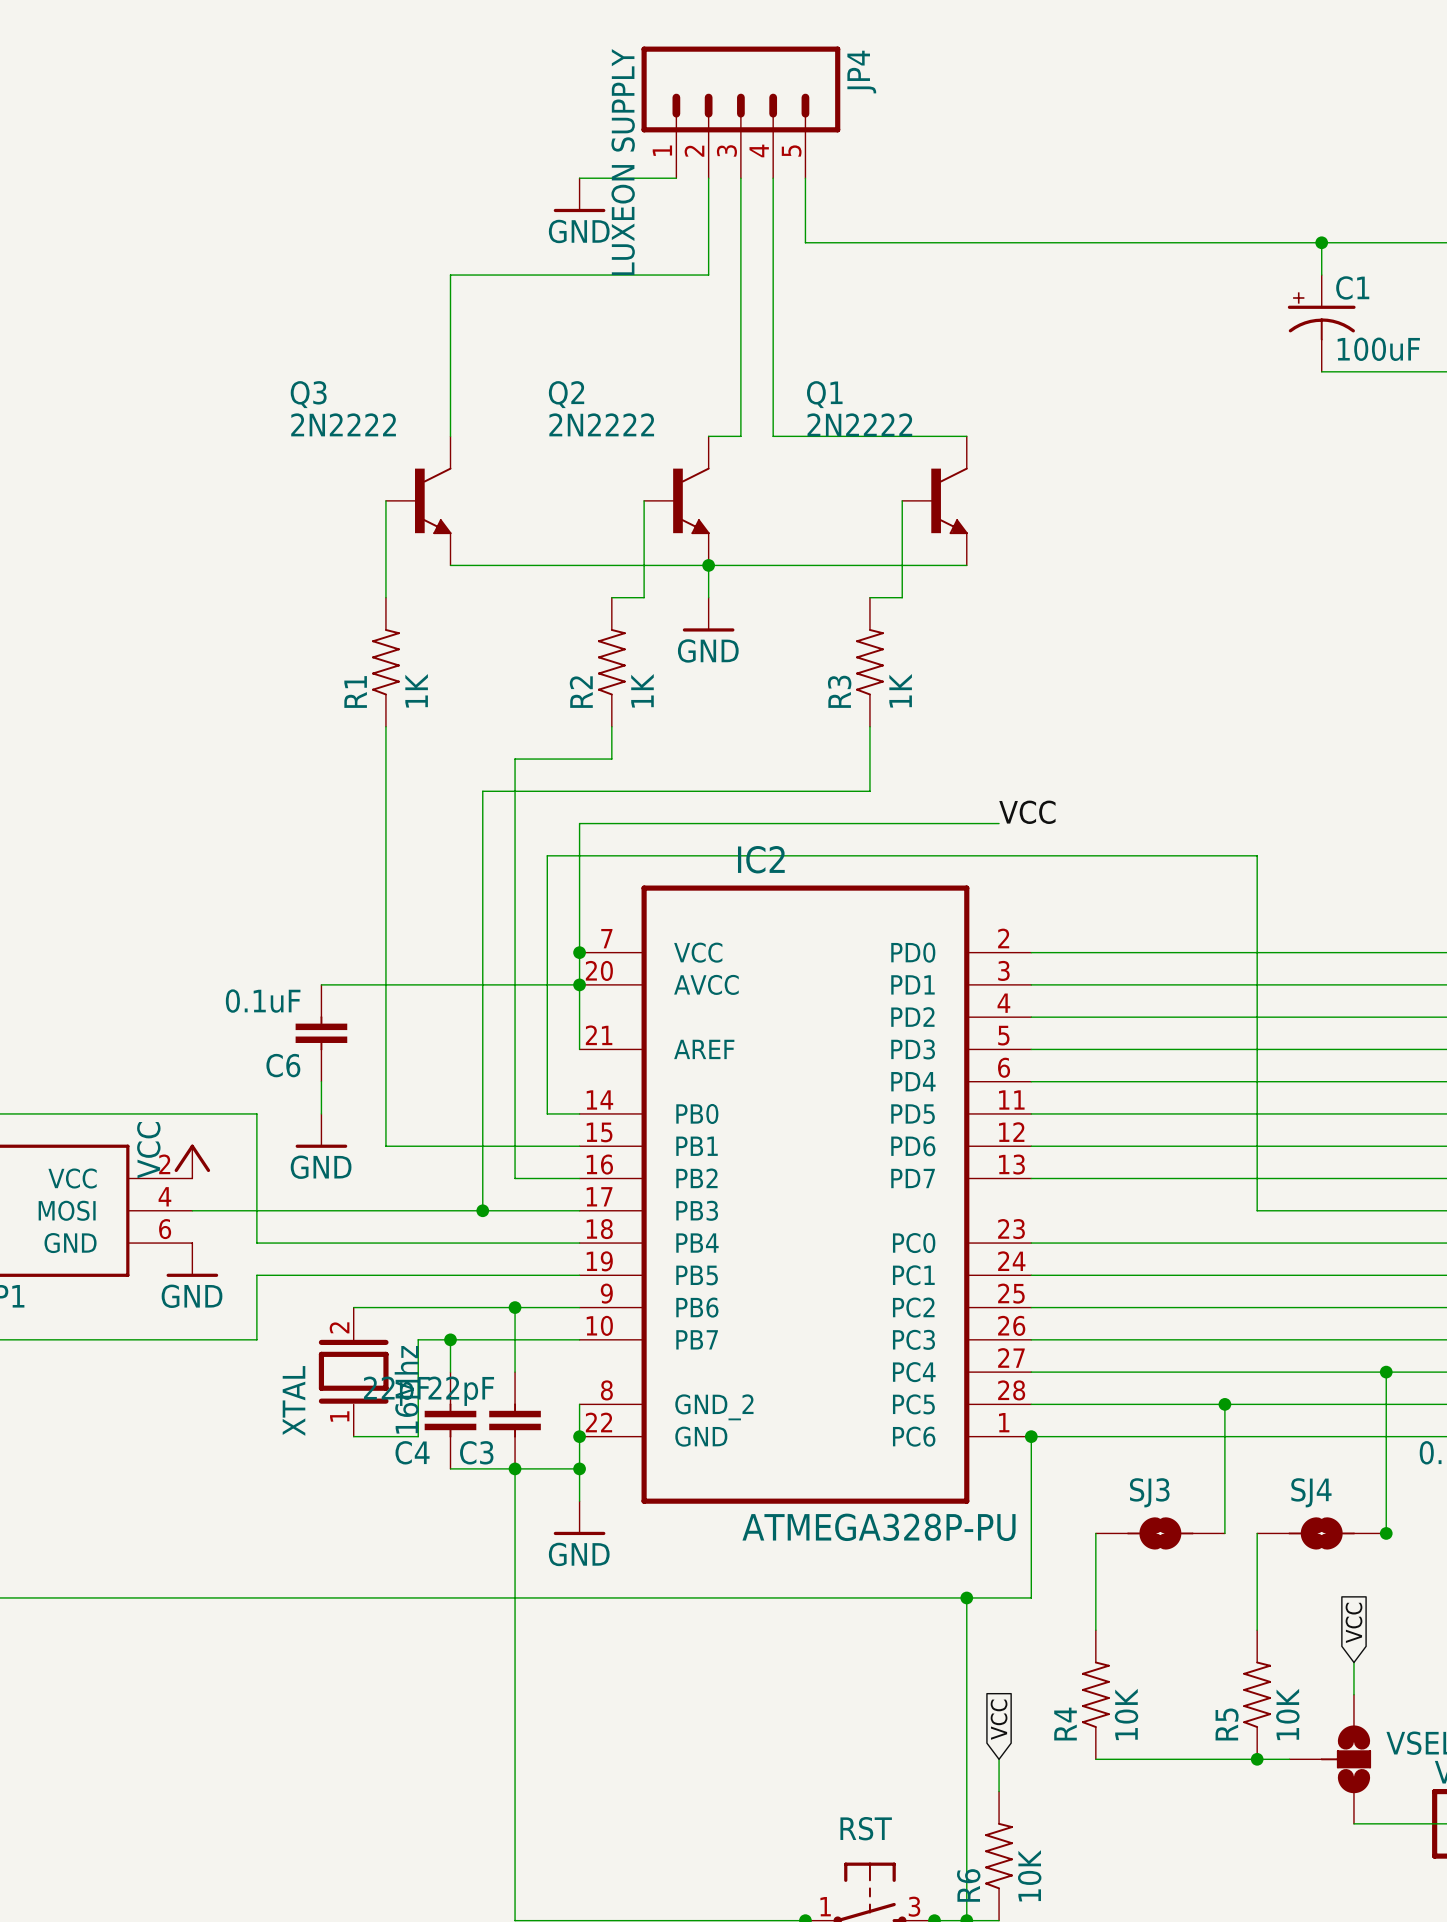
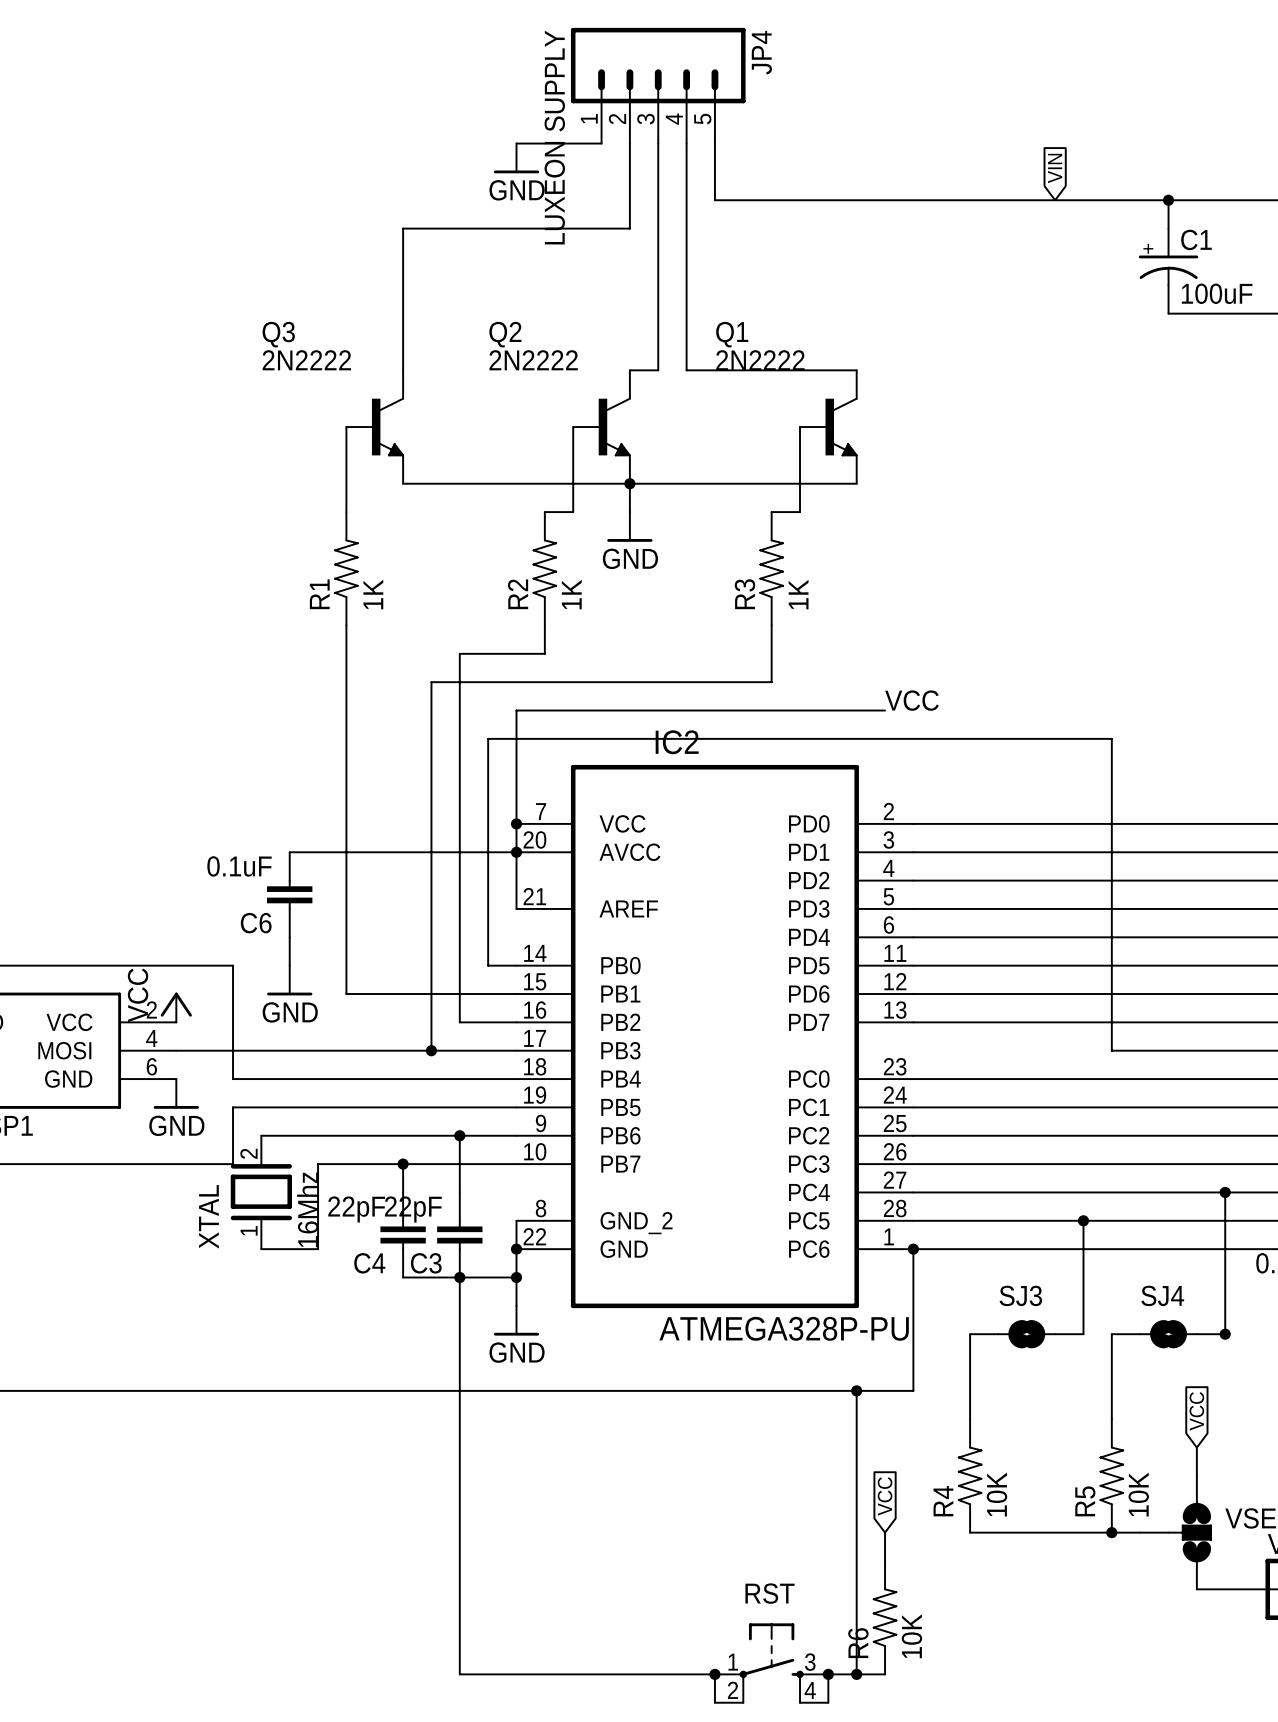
global label: none -> VIN (1055, 168)
wire: none -> (261, 1135) (318, 1135)
wire: (418, 1339) (418, 1436) (353, 1436) -> (374, 1164) (318, 1164) (318, 1249) (261, 1249)
XTAL position: (353, 1372) -> (261, 1192)

